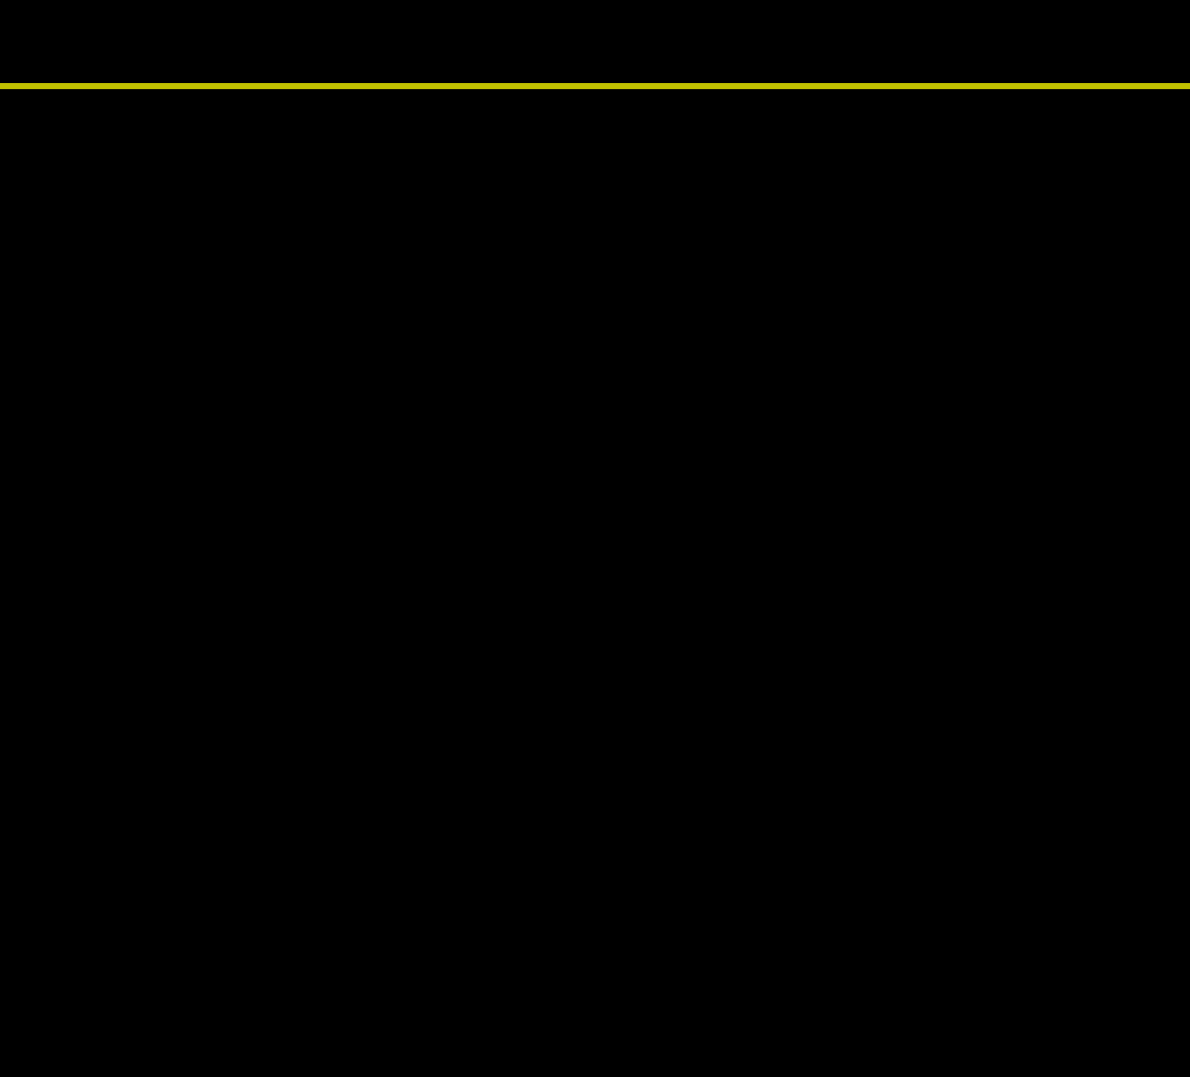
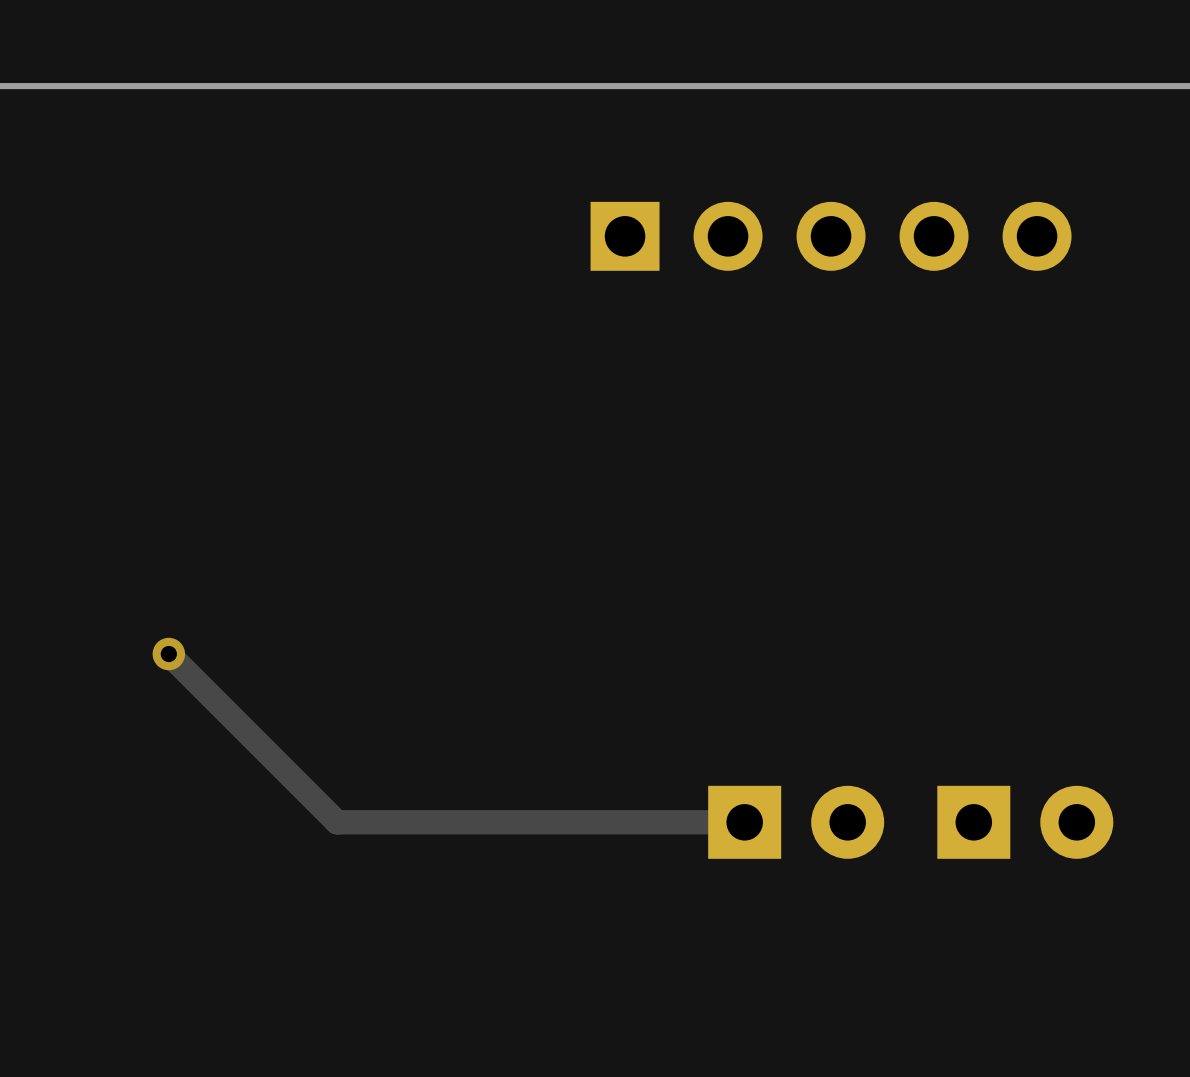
part: none -> (831, 236)
track: none -> (168, 654) (337, 822) (744, 822)
via: none -> (168, 654)
part: none -> (796, 822)
part: none -> (1025, 822)

